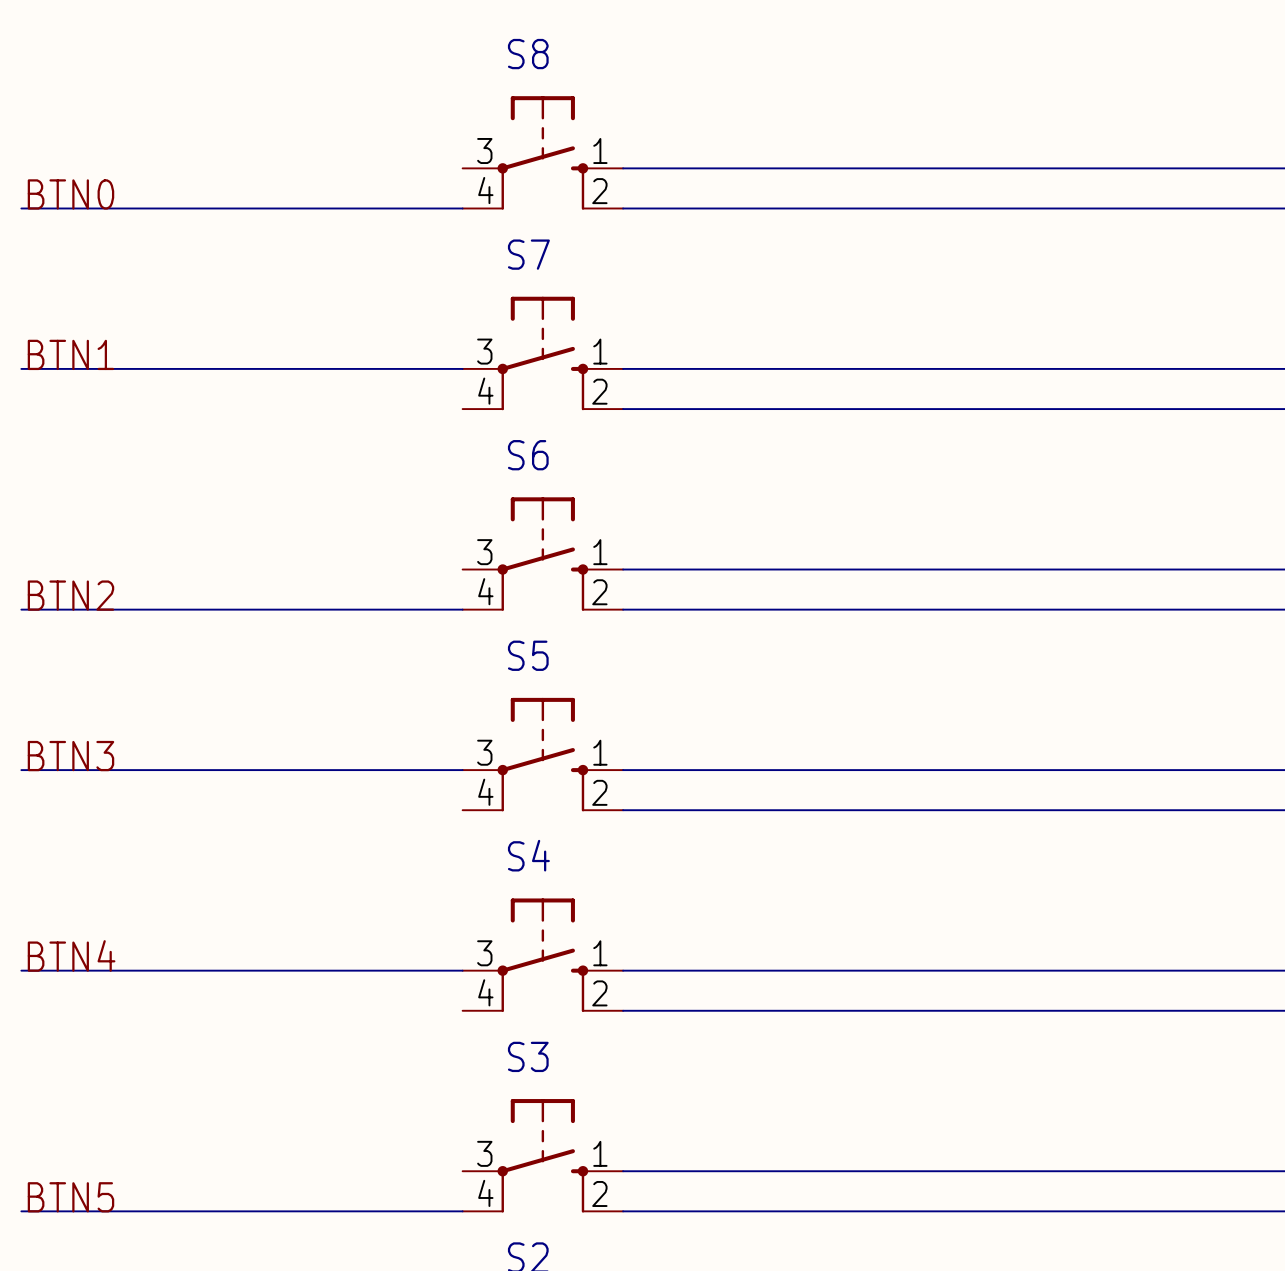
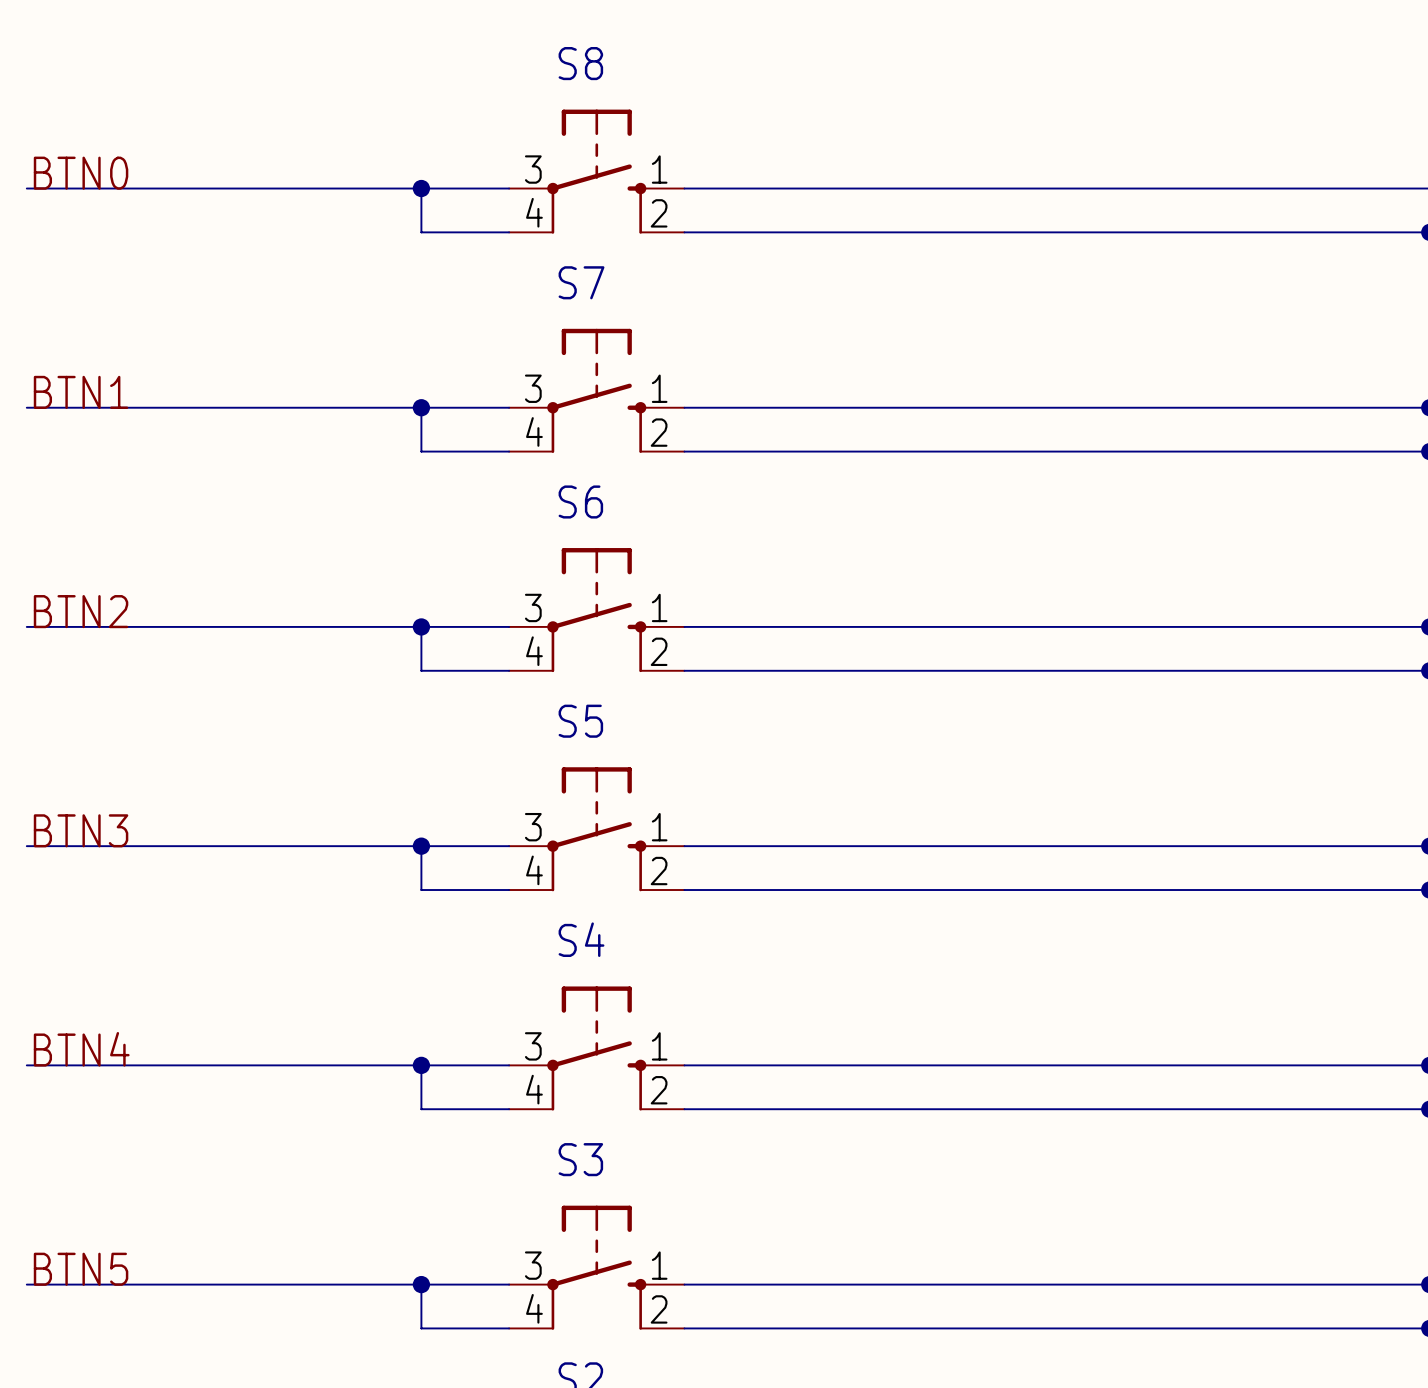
wire: none -> (26, 188) (509, 188)
junction: none -> (421, 188)
label position: BTN0 (70, 194) -> BTN0 (81, 173)
wire: (21, 208) (382, 208) -> (421, 188) (421, 232)
wire: none -> (421, 407) (421, 451) (509, 451)
junction: none -> (421, 407)
wire: none -> (26, 626) (509, 626)
junction: none -> (421, 626)
label position: BTN2 (70, 595) -> BTN2 (81, 611)
wire: (21, 609) (382, 609) -> (421, 626) (421, 670)
wire: none -> (421, 846) (421, 890) (509, 890)
junction: none -> (421, 846)
wire: none -> (421, 1065) (421, 1109) (509, 1109)
junction: none -> (421, 1065)
wire: none -> (26, 1284) (509, 1284)
junction: none -> (421, 1284)
label position: BTN5 (70, 1197) -> BTN5 (81, 1269)
wire: (21, 1211) (382, 1211) -> (421, 1284) (421, 1328)

